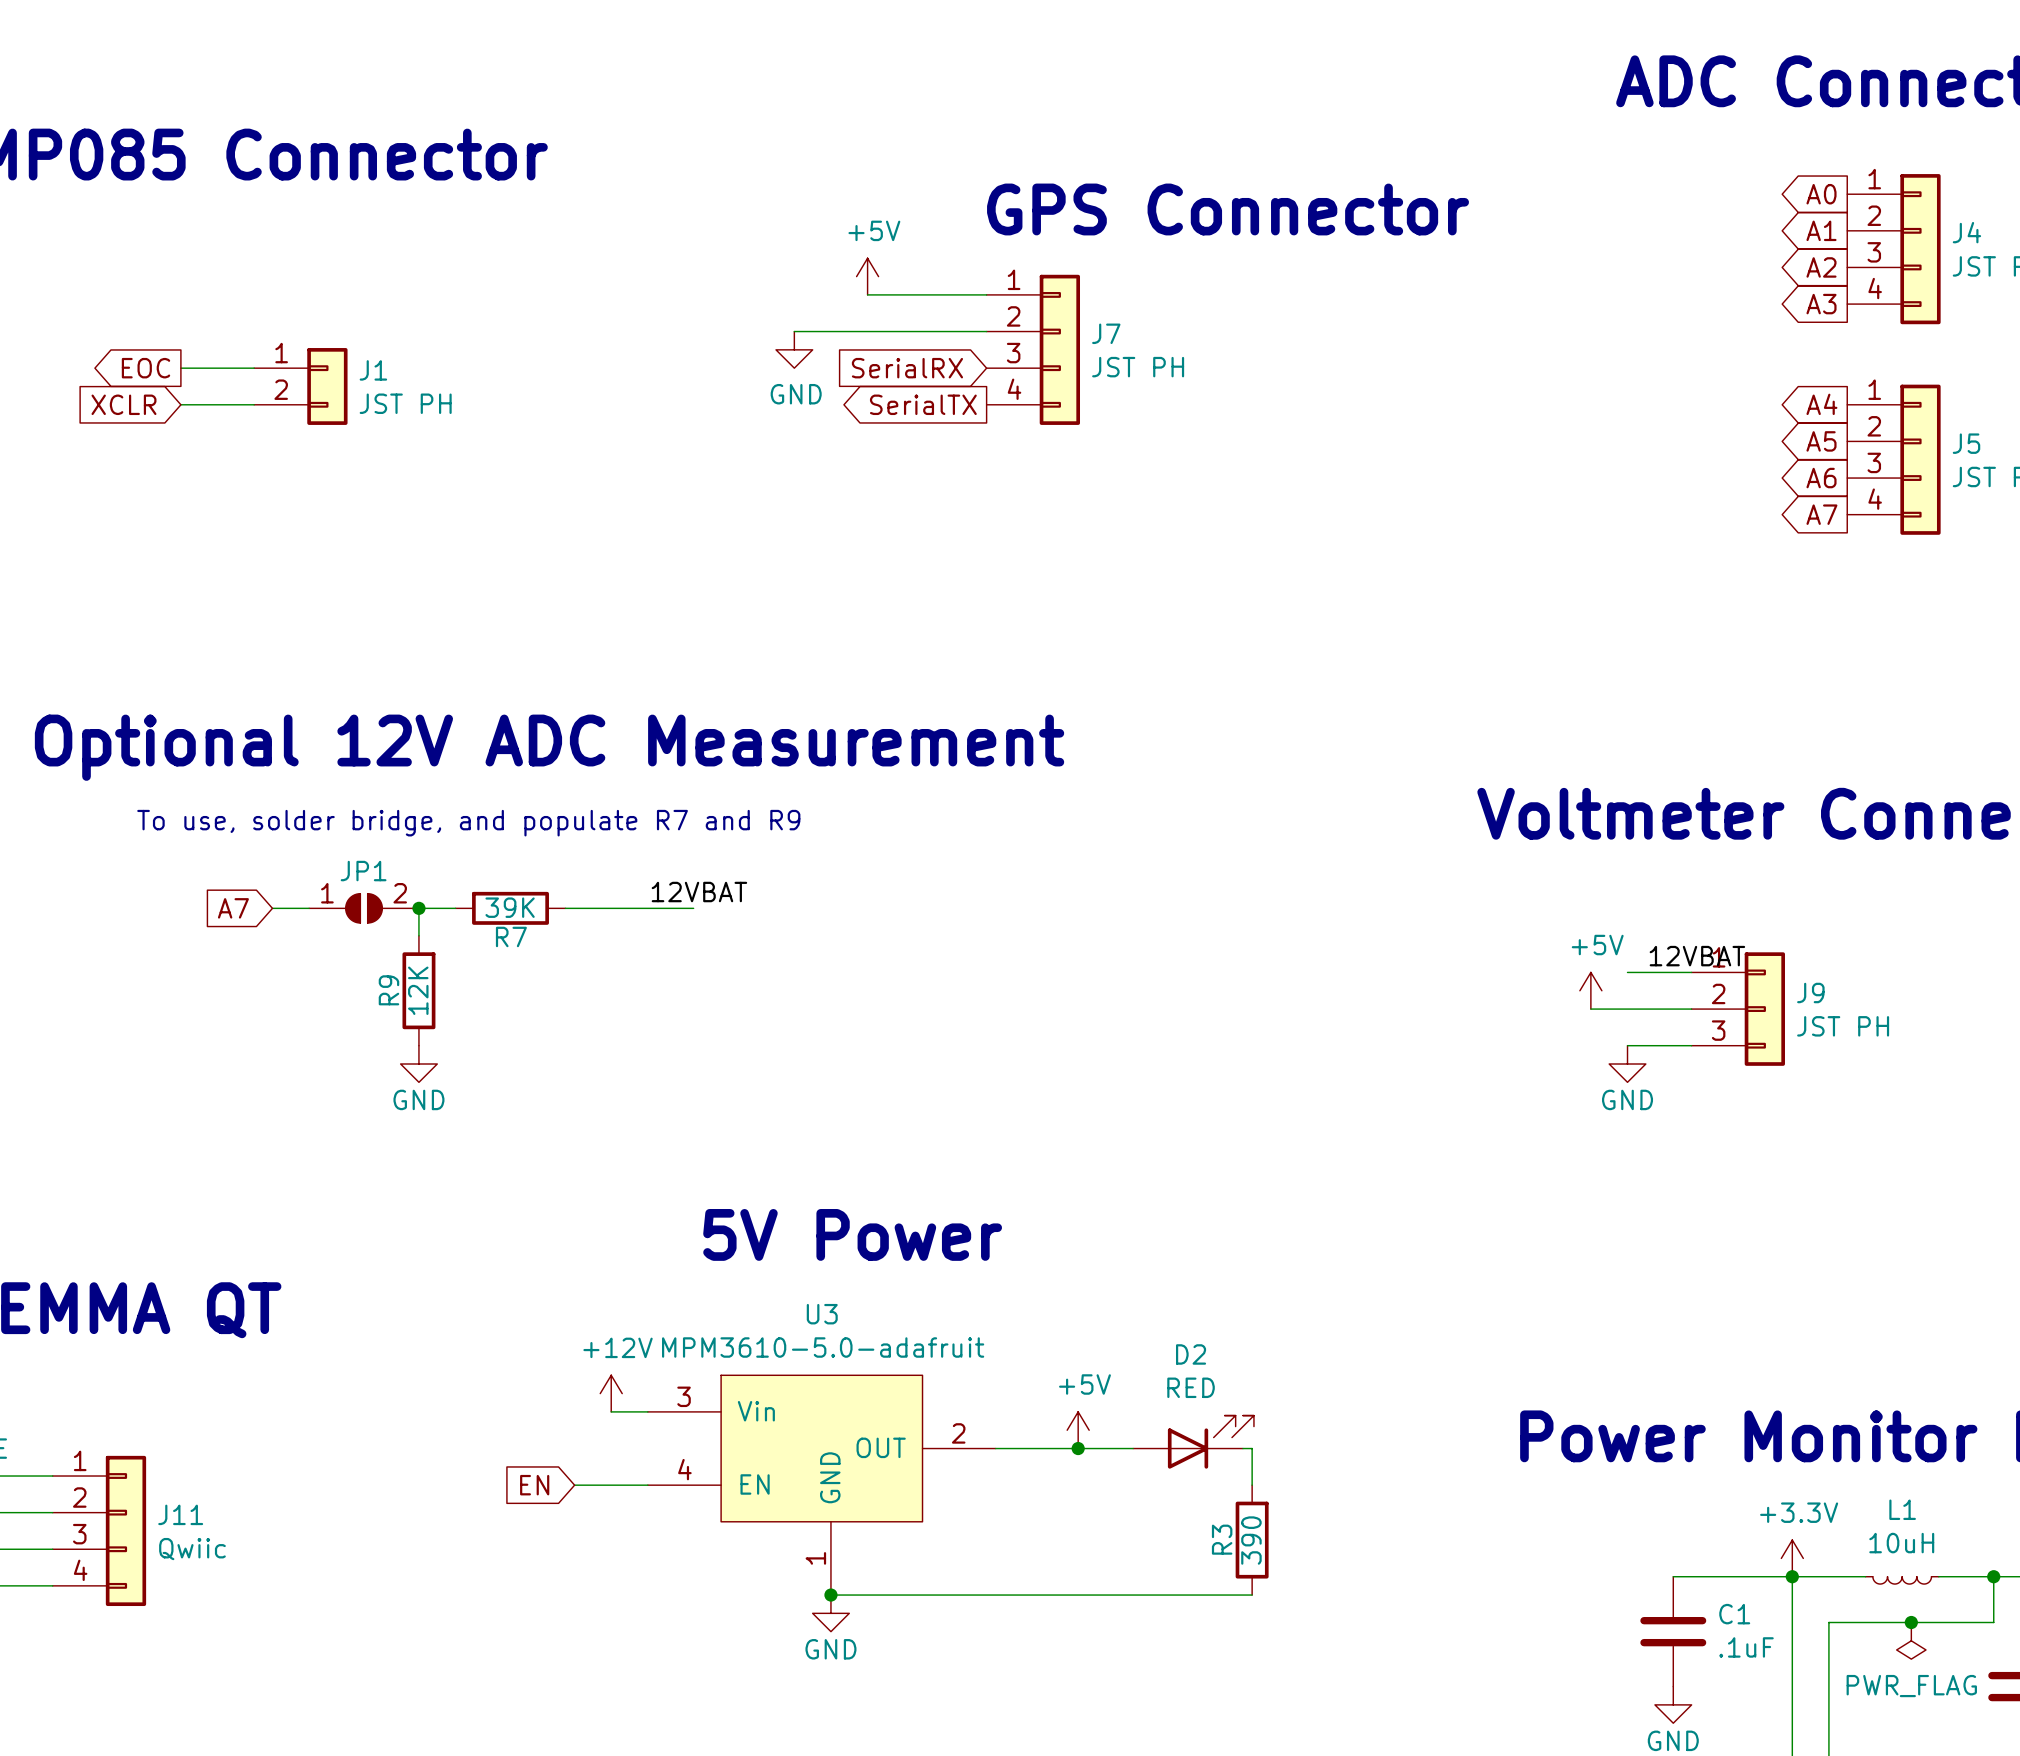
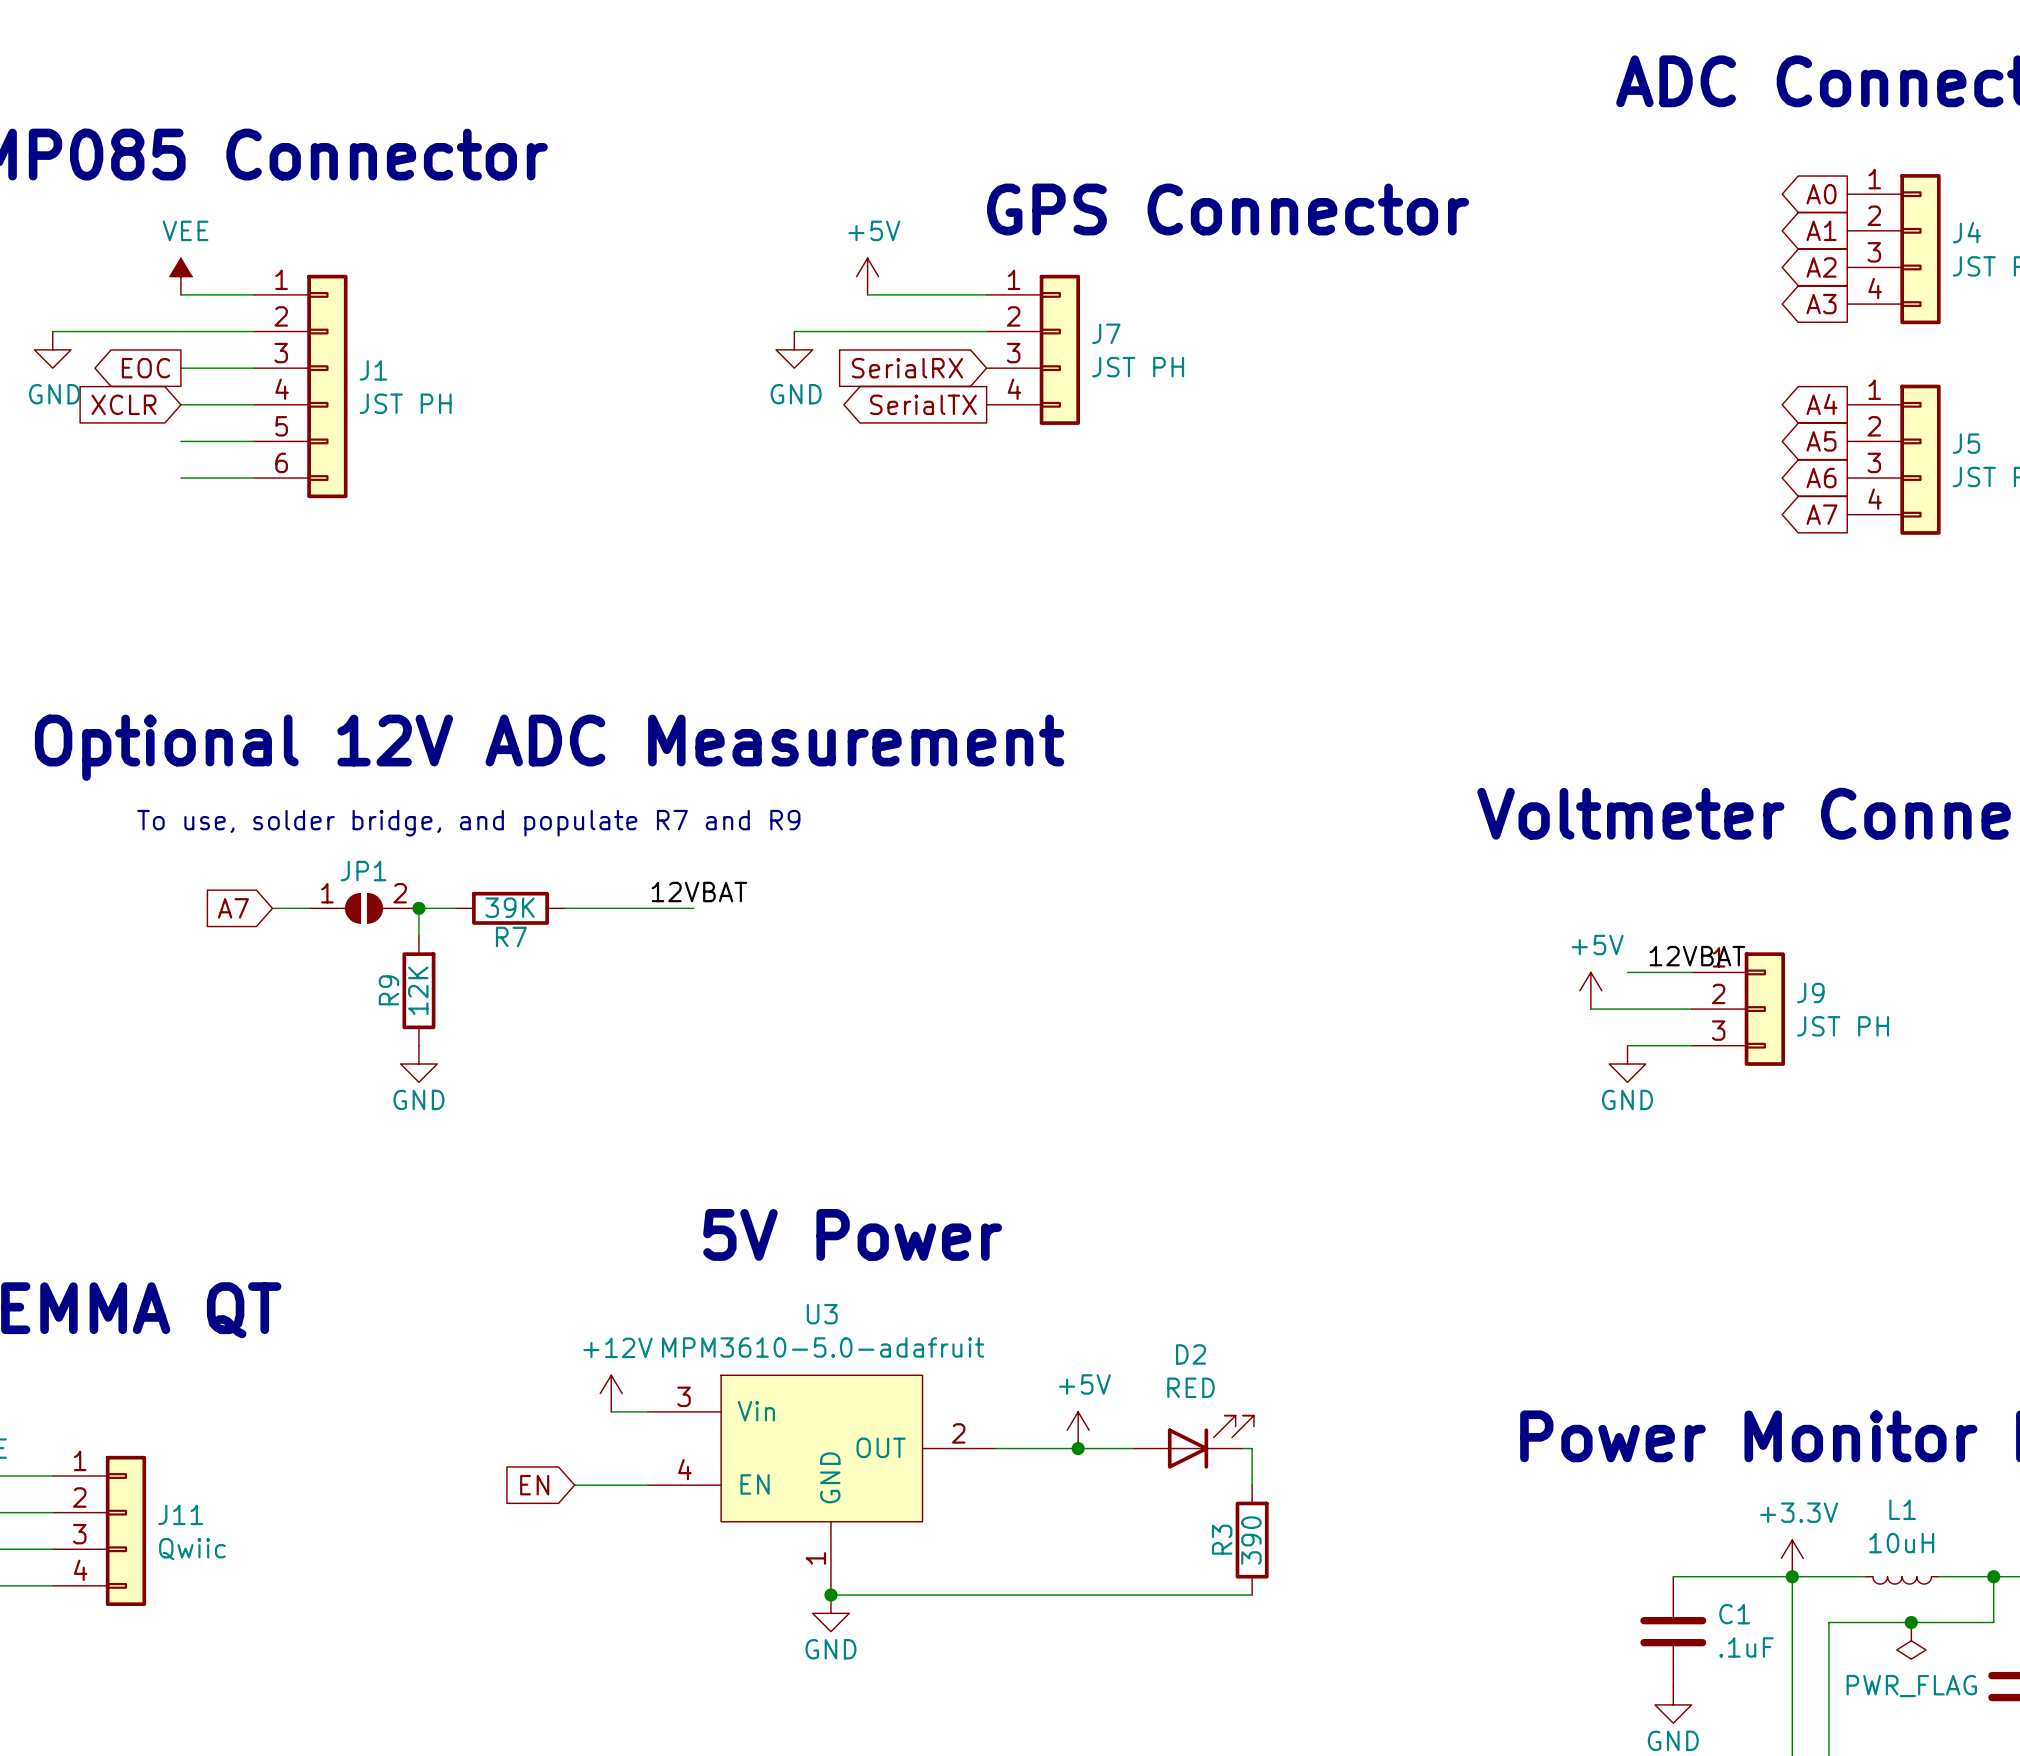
power symbol: none -> VEE (180, 276)
wire: none -> (180, 294) (254, 294)
wire: none -> (52, 331) (254, 331)
J1 symbol: [254, 348, 348, 425] -> [254, 274, 348, 499]
power symbol: none -> GND (52, 349)
wire: none -> (180, 441) (254, 441)
wire: none -> (180, 478) (254, 478)

